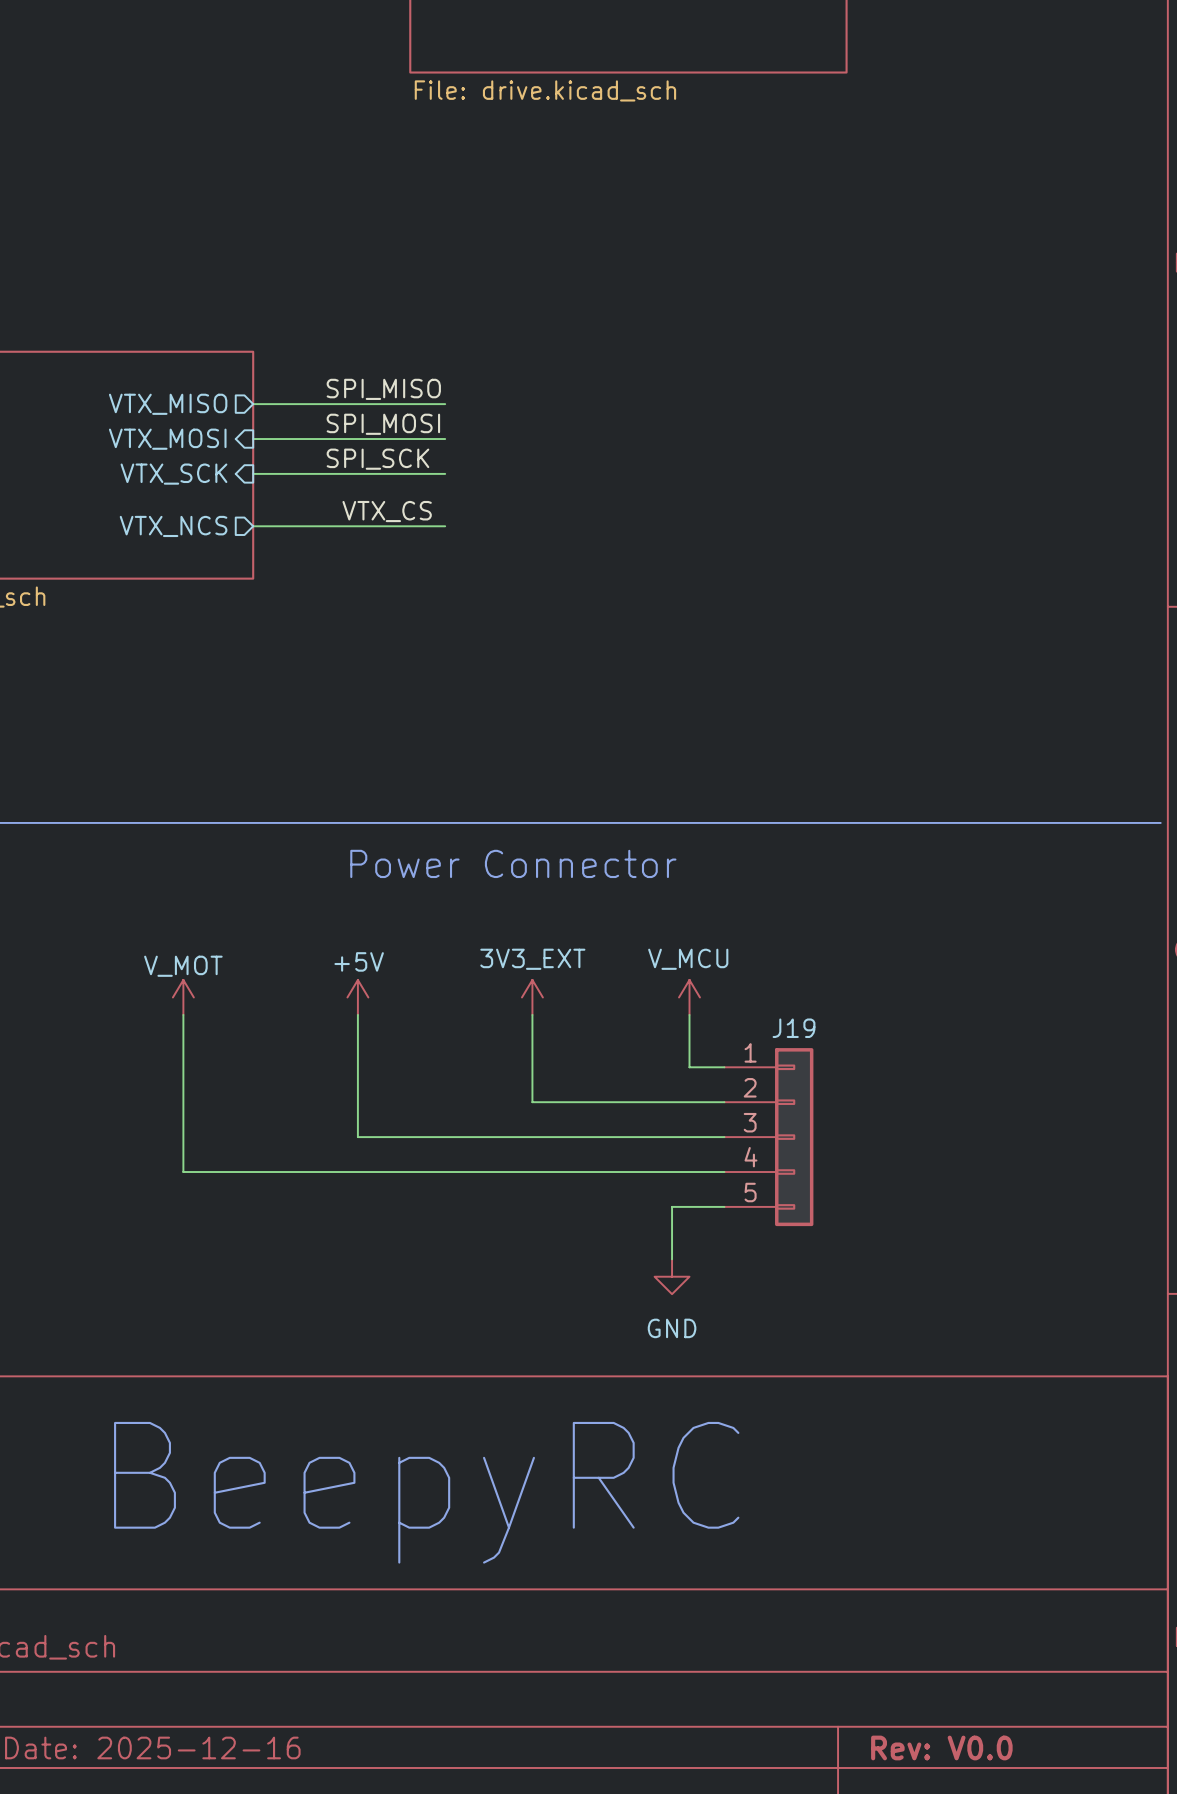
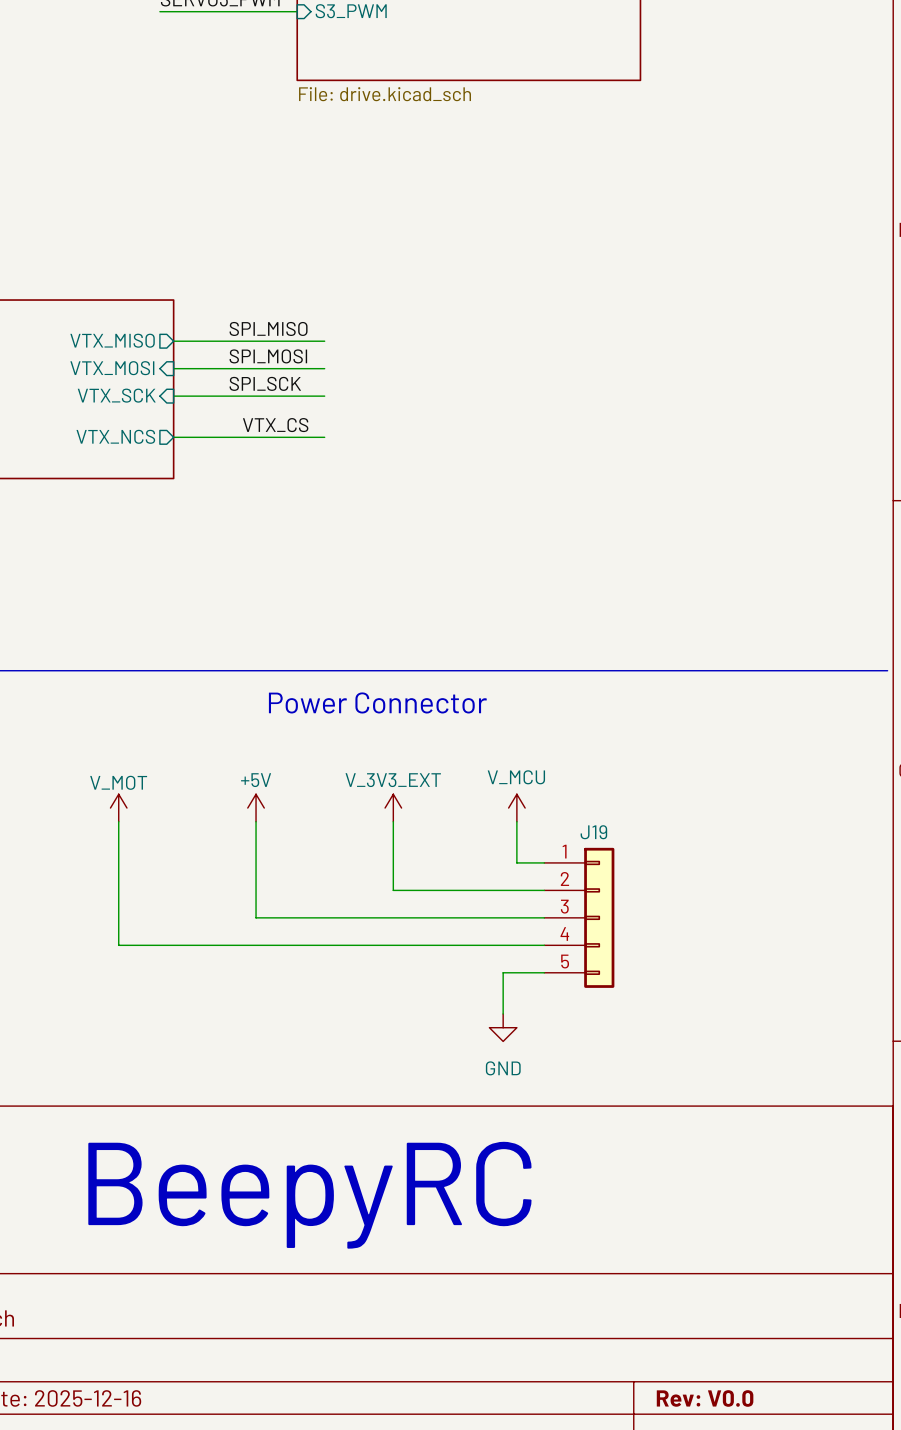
power symbol: 3V3_EXT (532, 997) -> V_3V3_EXT (393, 808)

